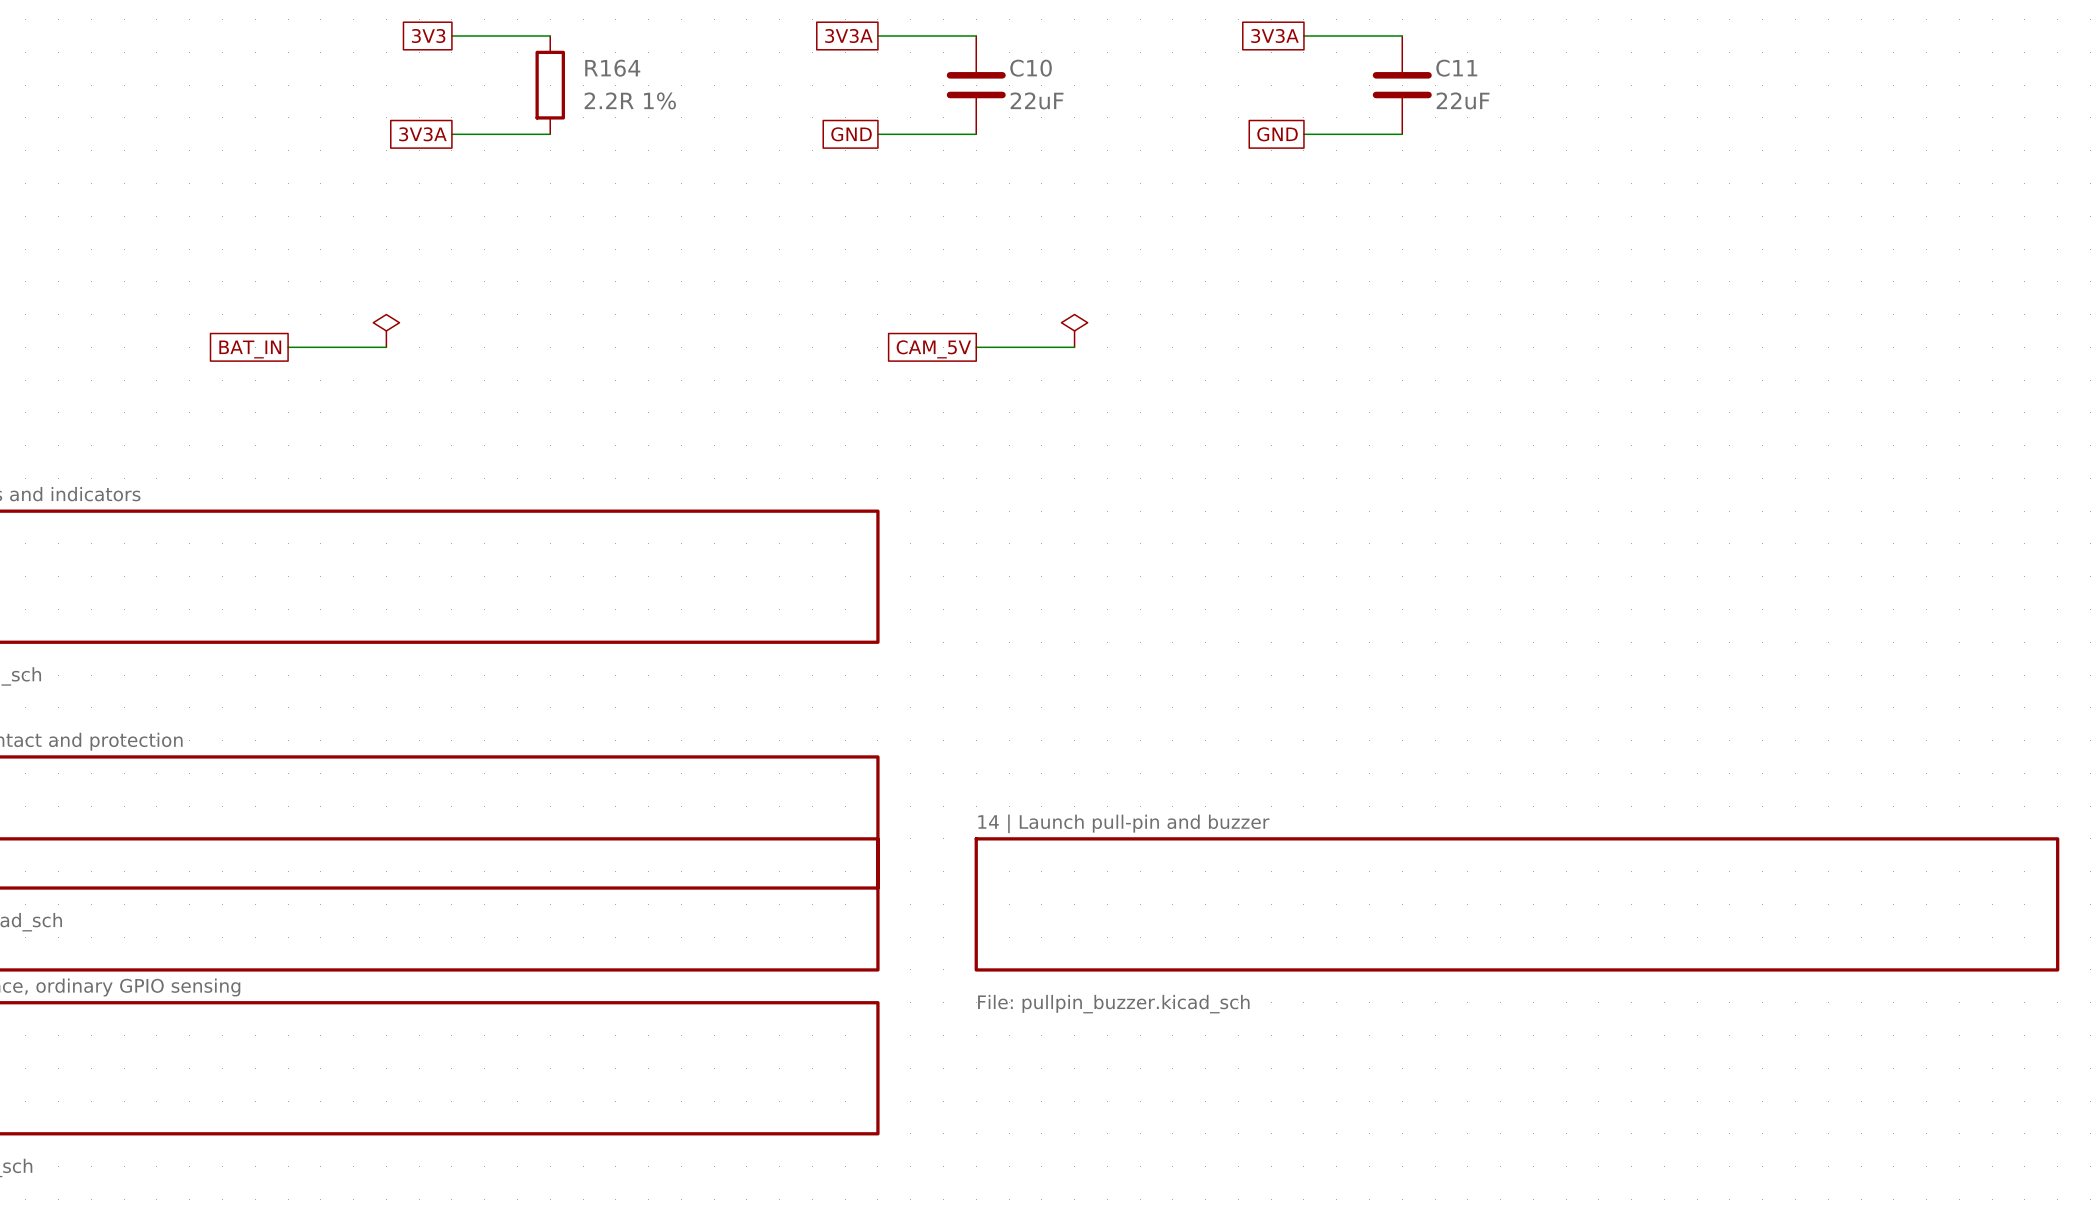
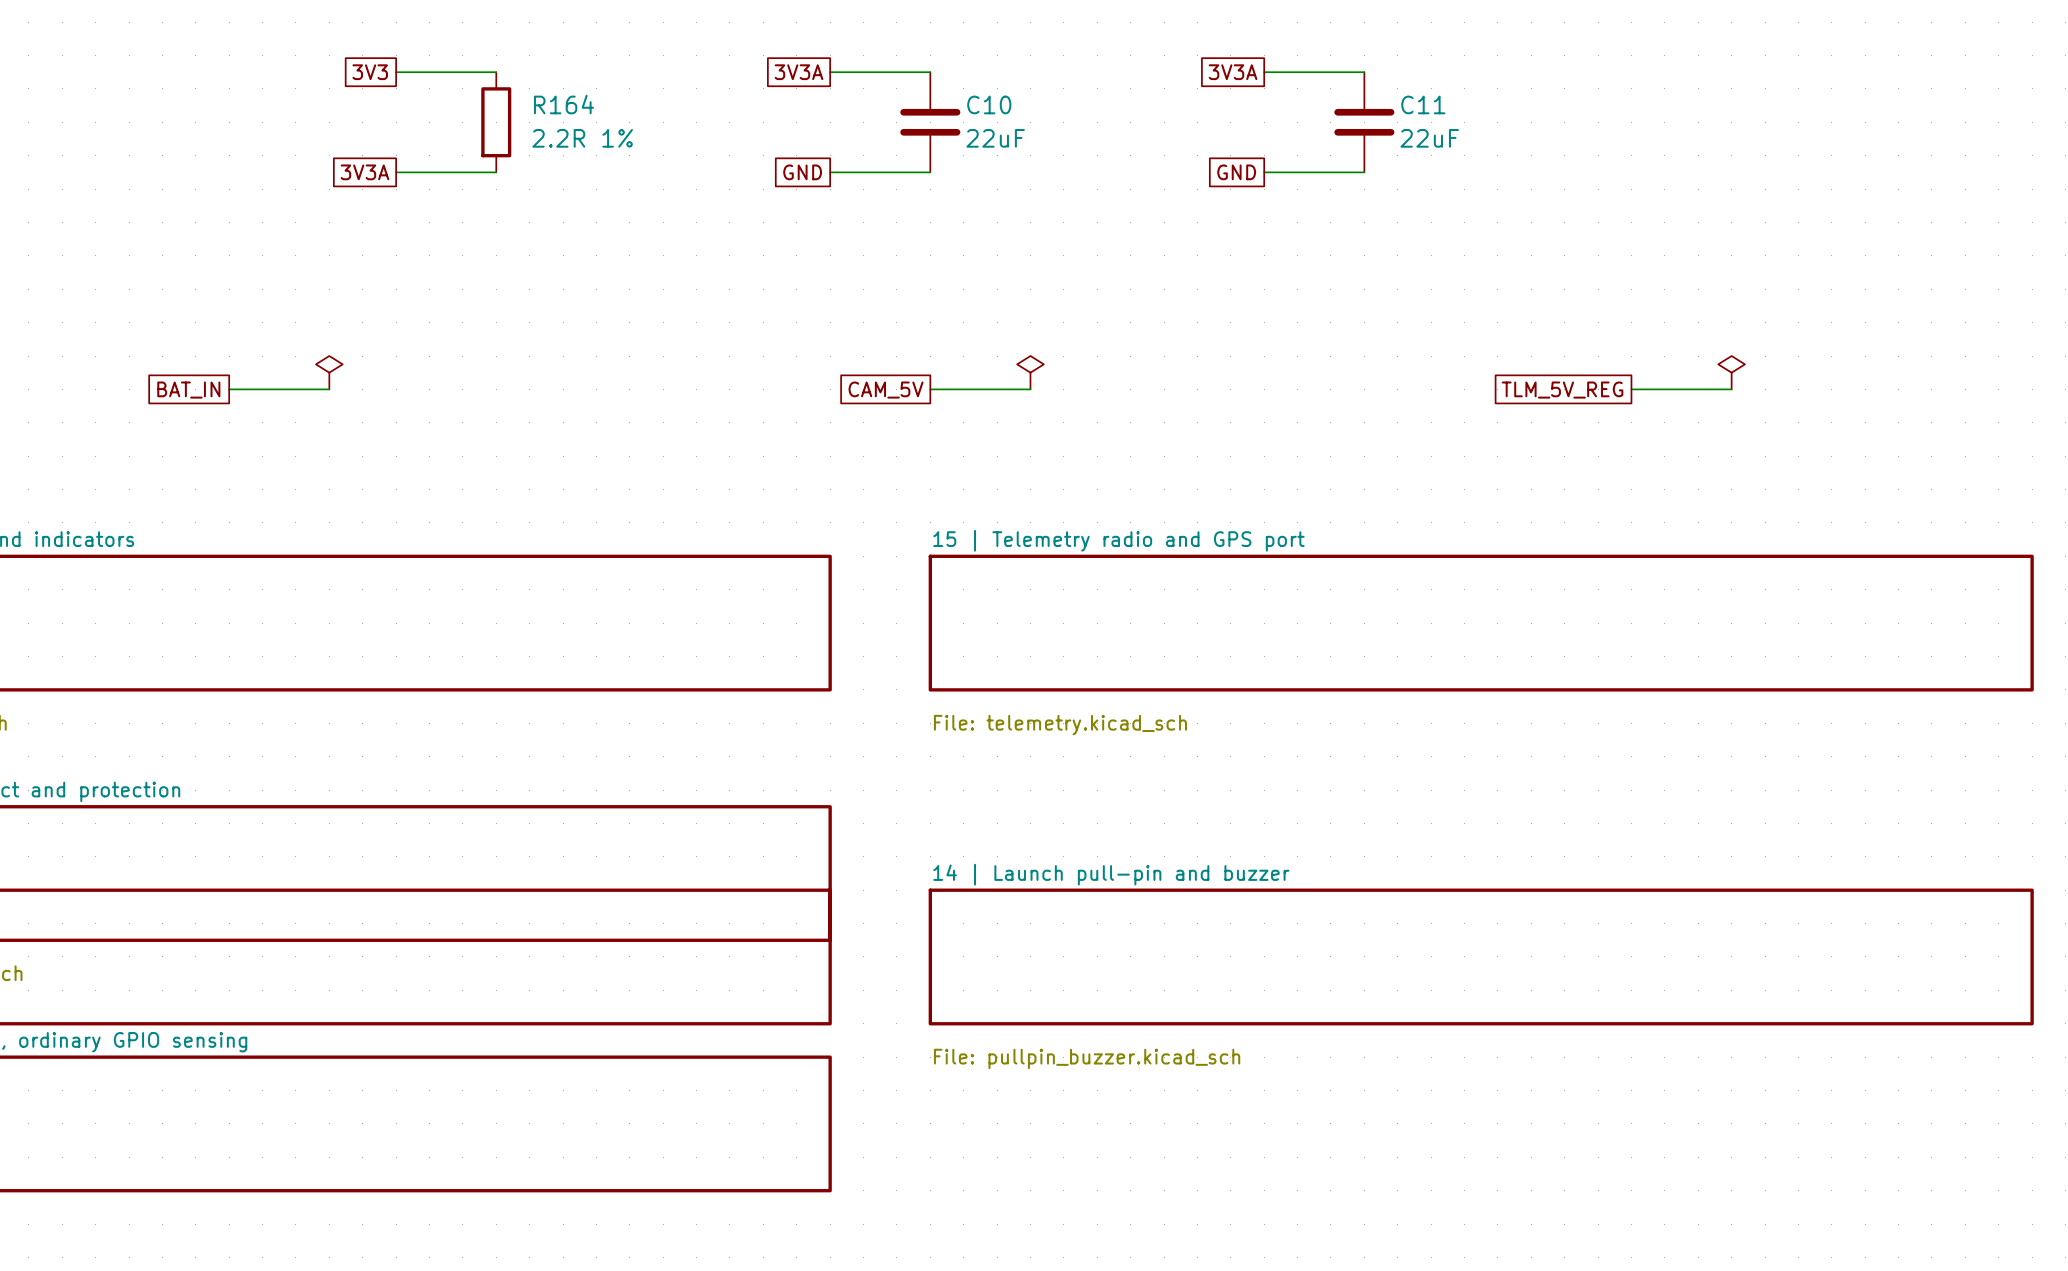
power symbol: none -> (1731, 372)
wire: none -> (1631, 389) (1731, 389)
global label: none -> TLM_5V_REG (1562, 390)
sheet 15 | Telemetry radio and GPS port: none -> File: telemetry.kicad_sch (1481, 623)

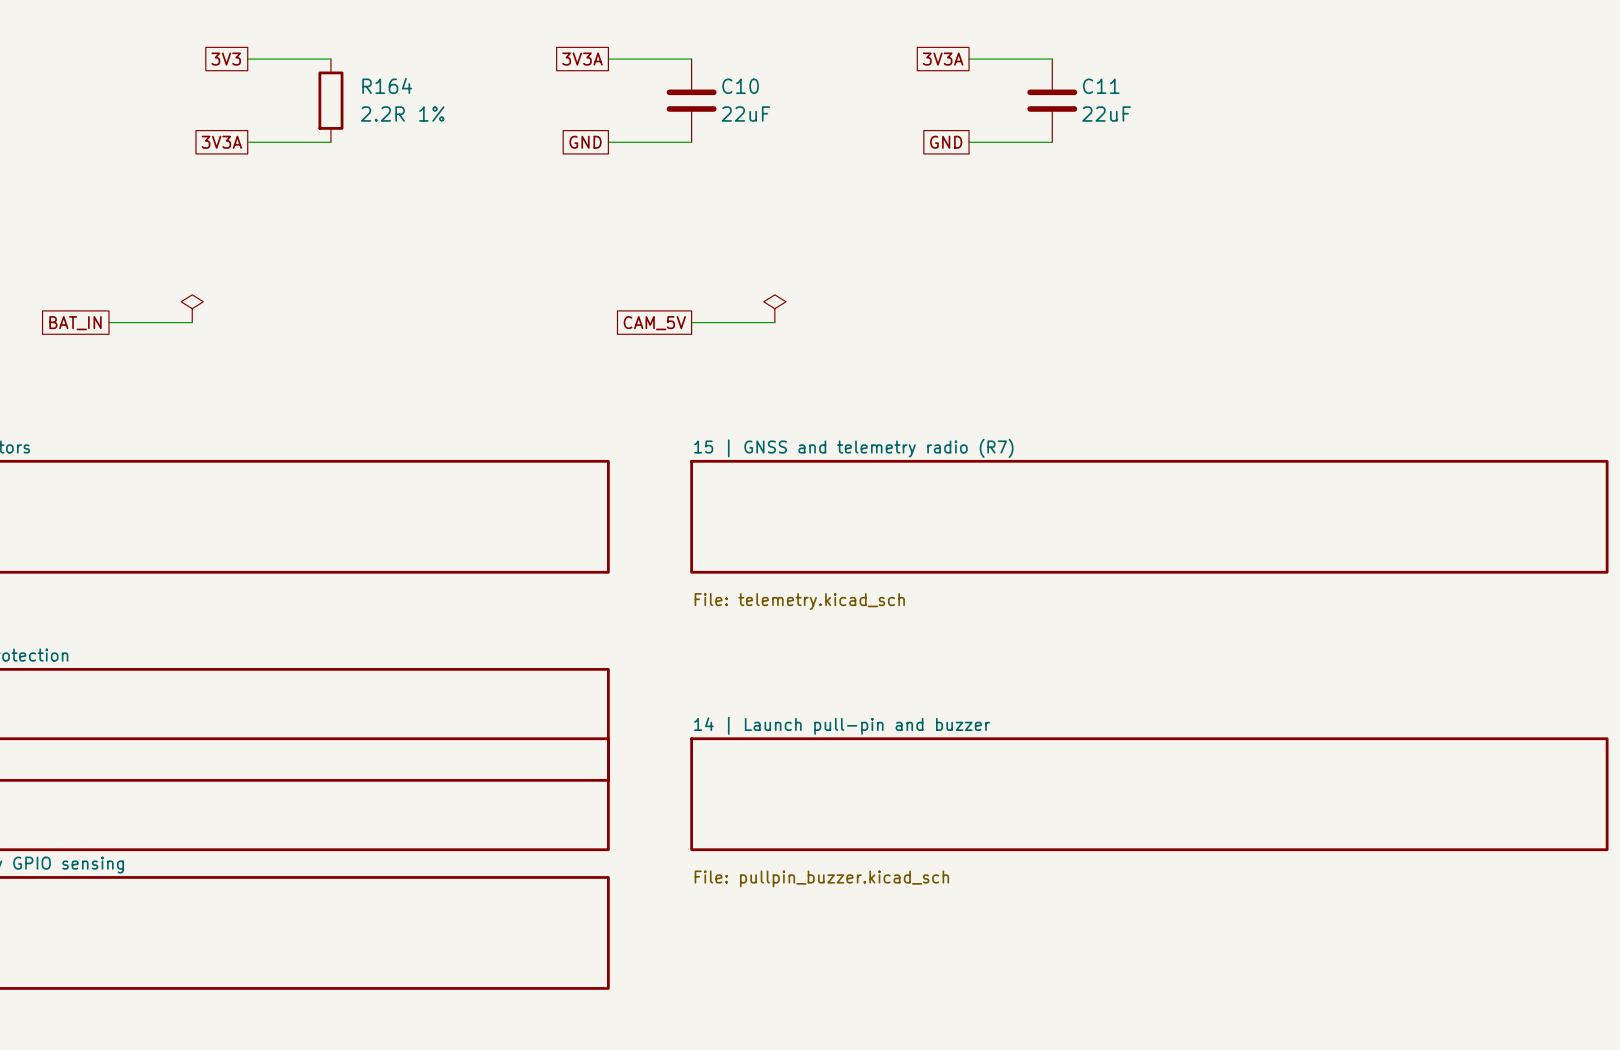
power symbol: (1731, 372) -> none
wire: (1631, 389) (1731, 389) -> none
global label: TLM_5V_REG (1562, 390) -> none
sheet 15 | Telemetry radio and GPS port name: 15 | Telemetry radio and GPS port (1118, 540) -> 15 | GNSS and telemetry radio (R7) (853, 448)

